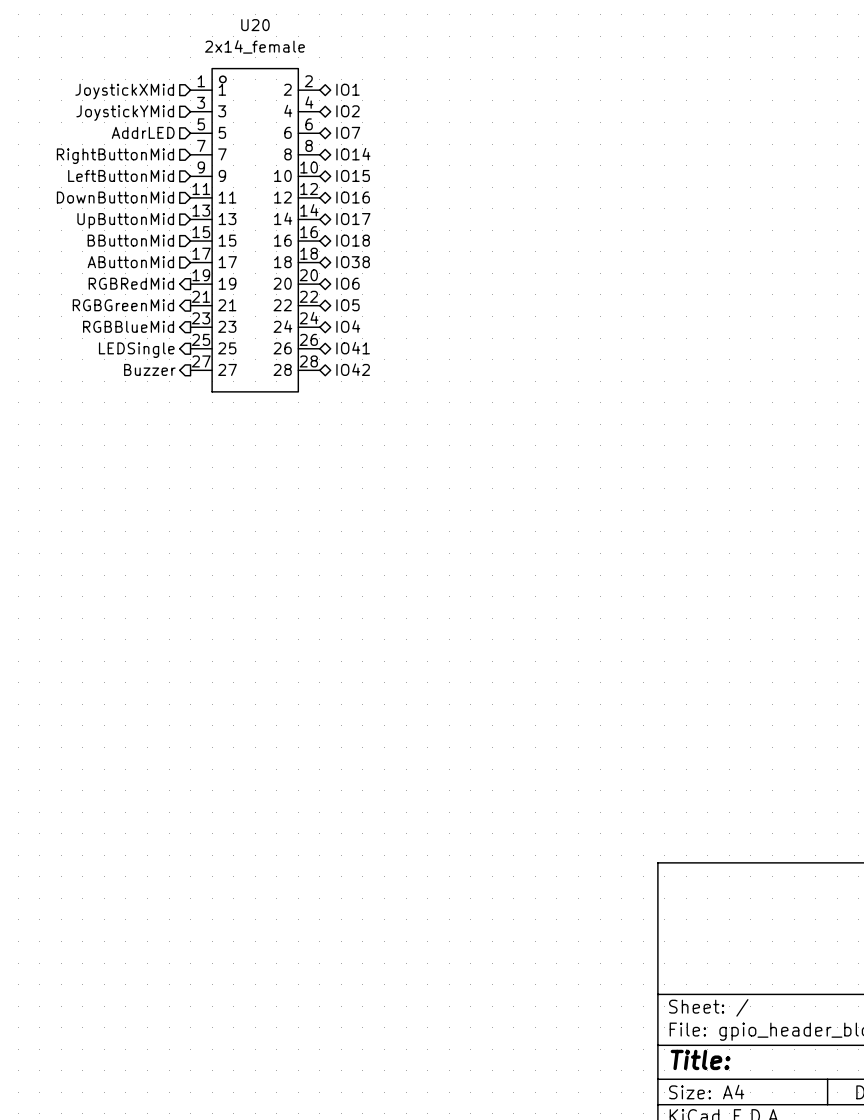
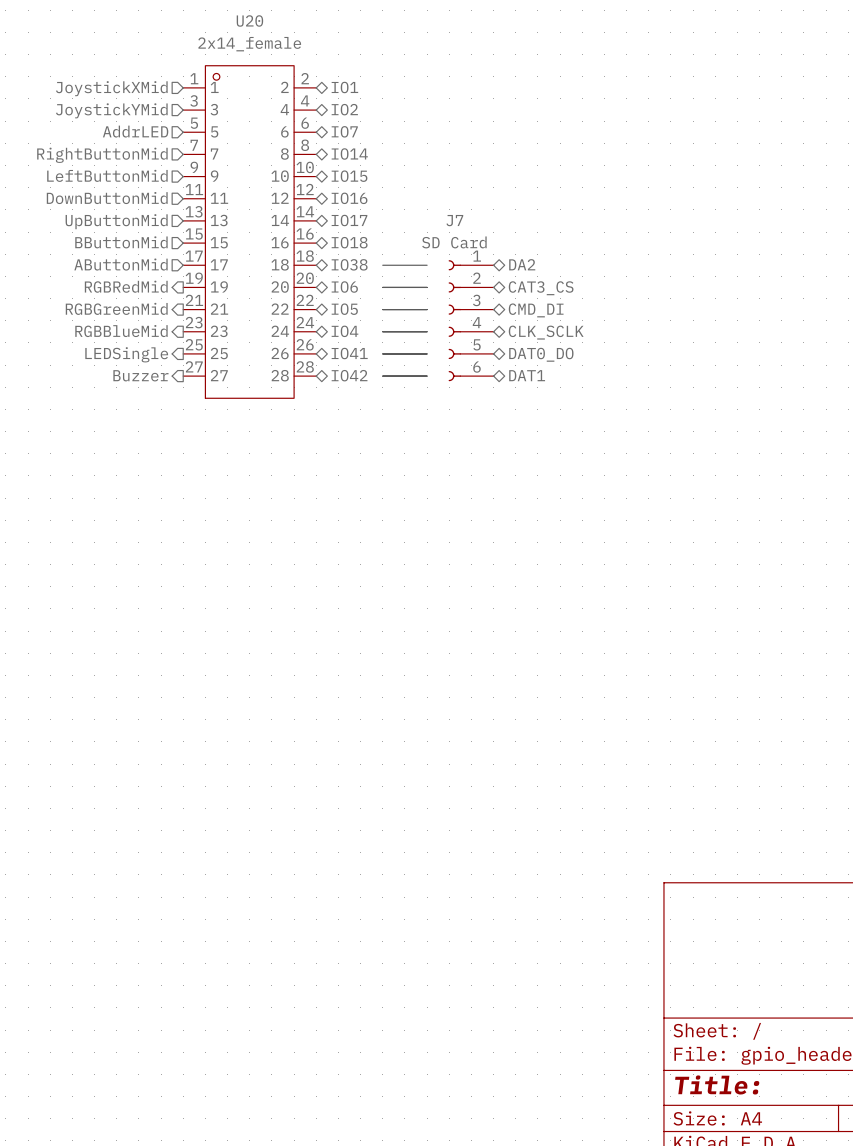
line: none -> (382, 265) (427, 265)
hierarchical label: none -> DA2 (522, 264)
line: none -> (382, 287) (427, 287)
hierarchical label: none -> CAT3_CS (541, 288)
line: none -> (382, 309) (427, 309)
hierarchical label: none -> CMD_DI (536, 310)
J7: none -> SD Card (471, 320)
line: none -> (382, 331) (427, 331)
hierarchical label: none -> CLK_SCLK (546, 332)
line: none -> (382, 353) (427, 353)
hierarchical label: none -> DAT0_DO (541, 354)
hierarchical label: none -> DAT1 (527, 375)
line: none -> (382, 376) (427, 376)

